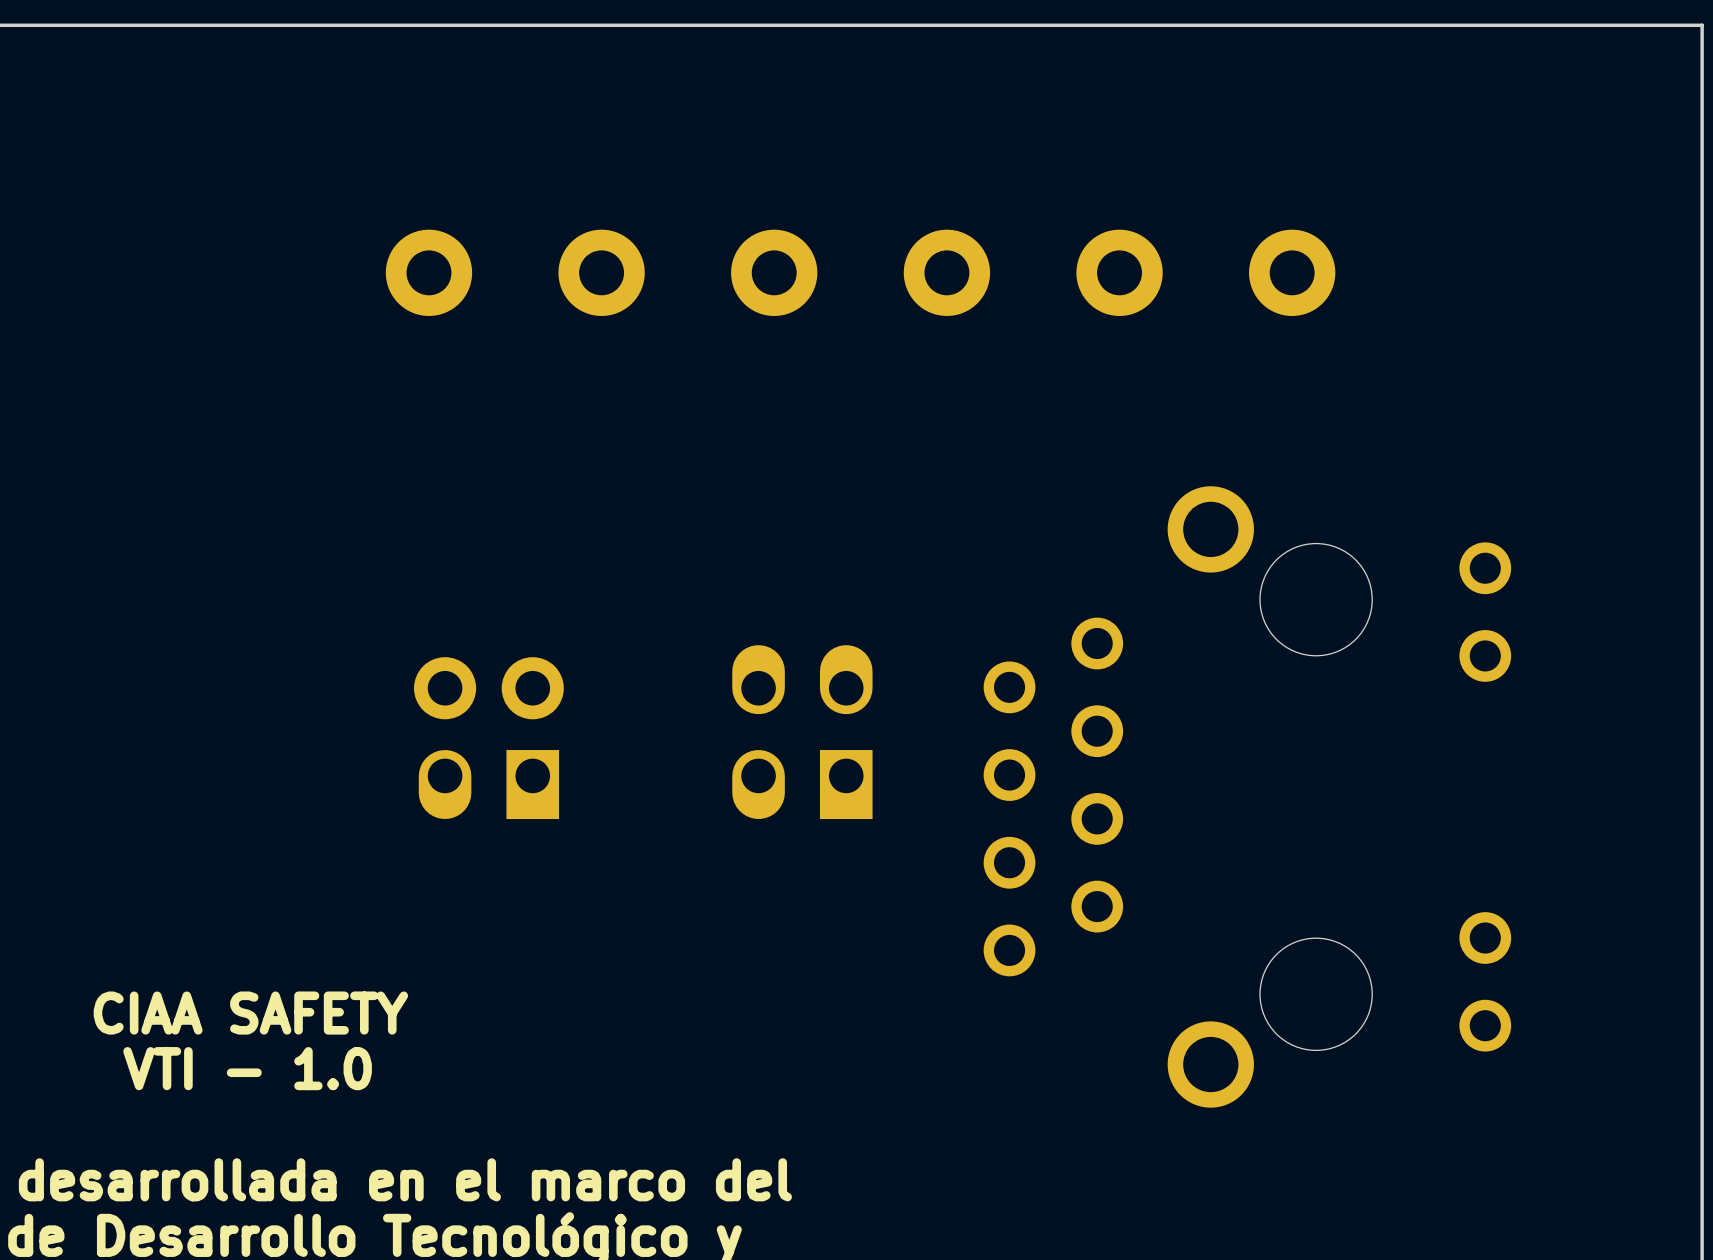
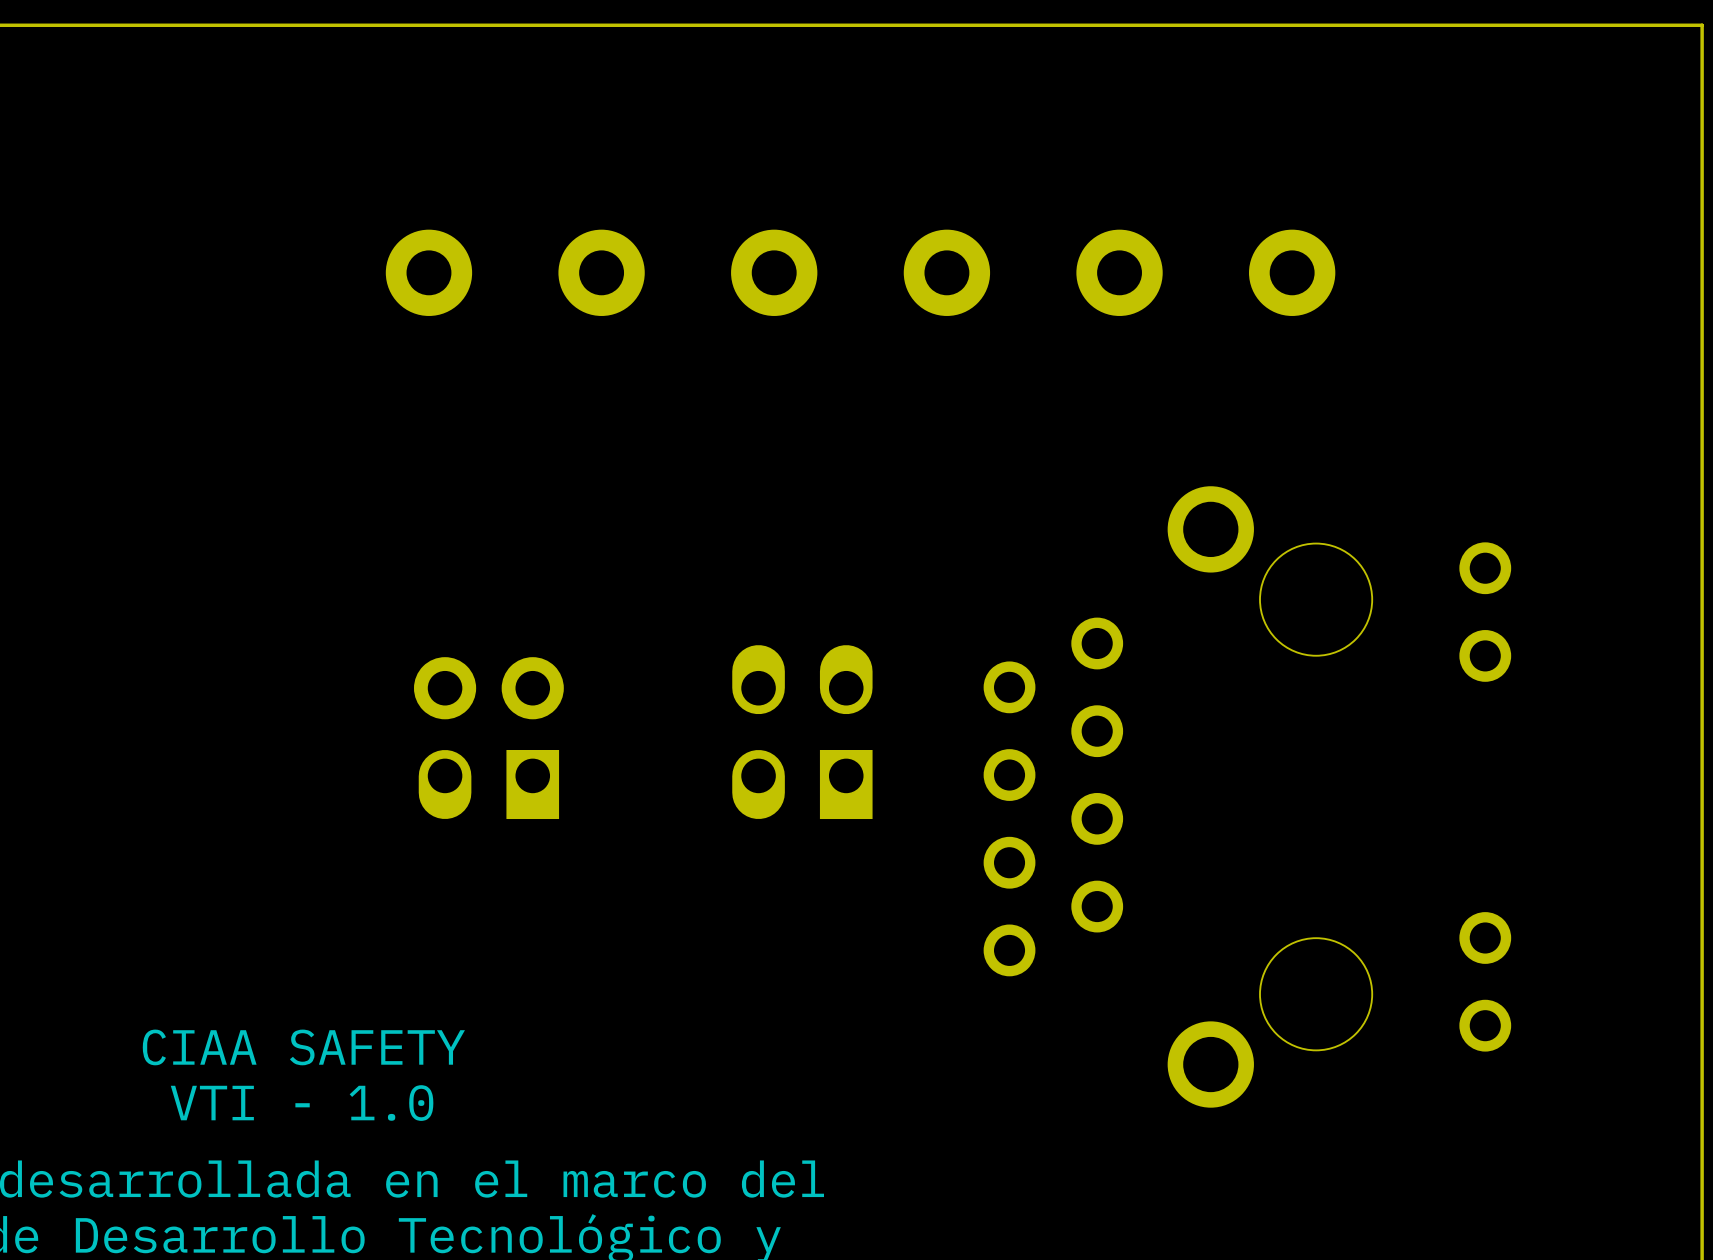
text position: CIAA SAFETY (250, 1013) -> CIAA SAFETY (303, 1047)
text position: VTI - 1.0 (247, 1068) -> VTI - 1.0 (302, 1103)

